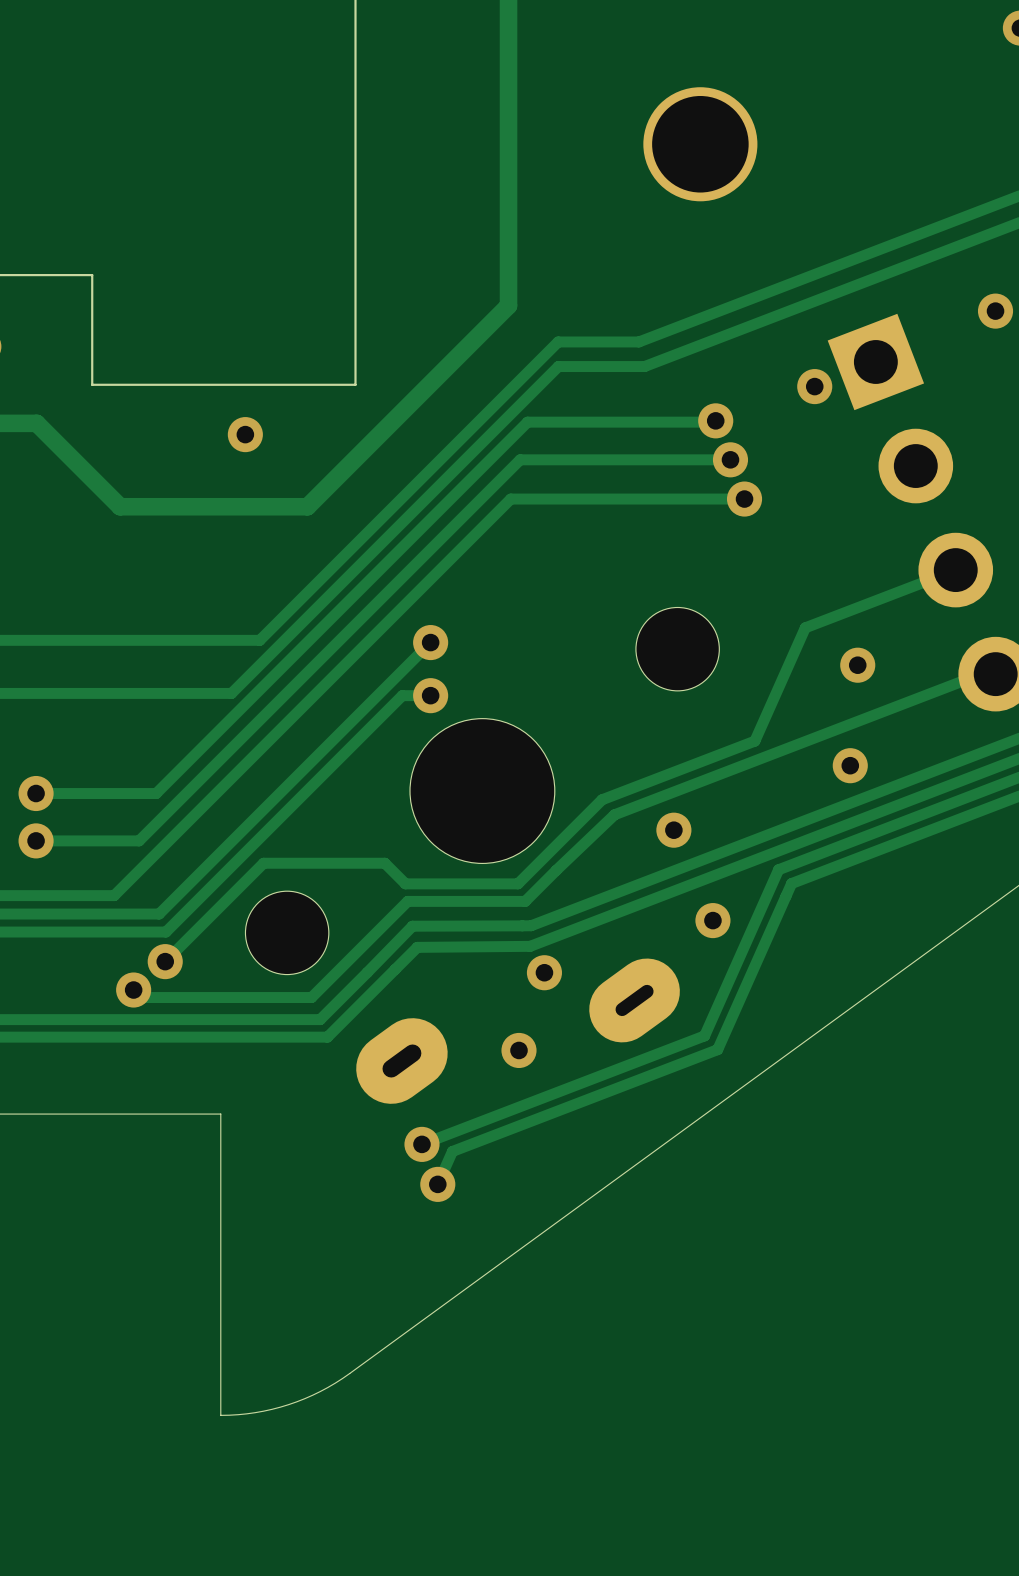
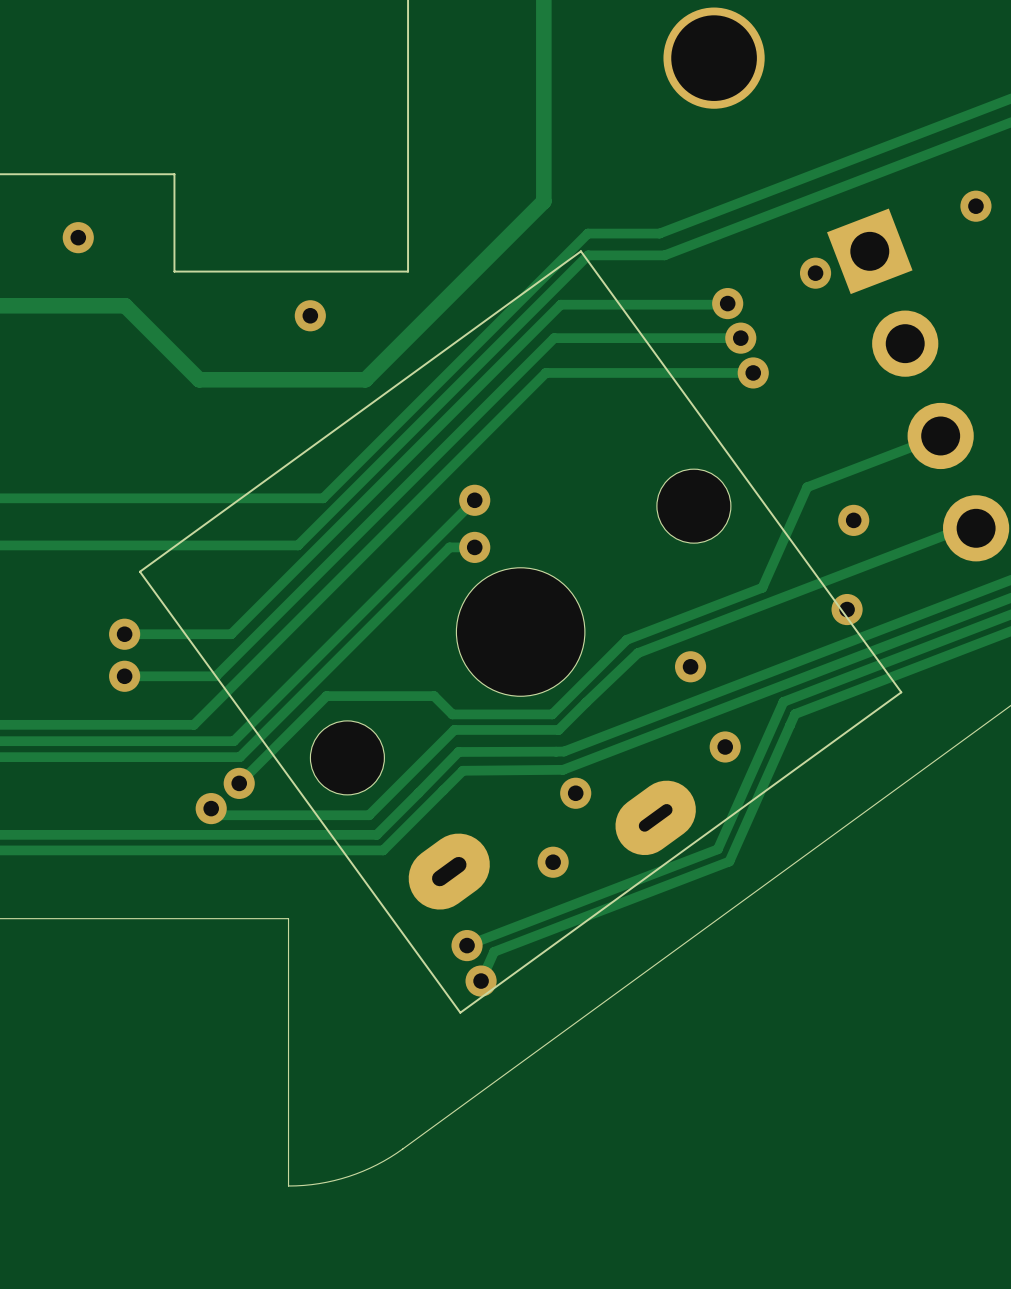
part: none -> (520, 632)

